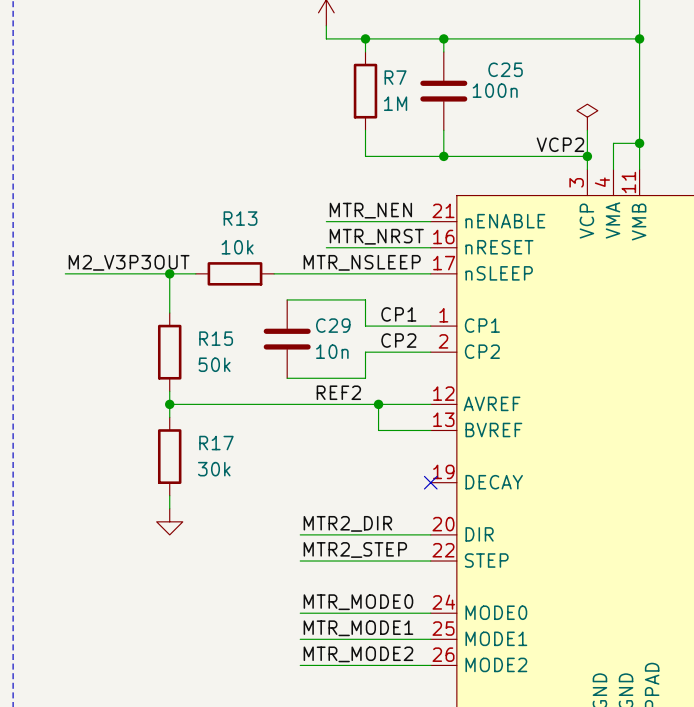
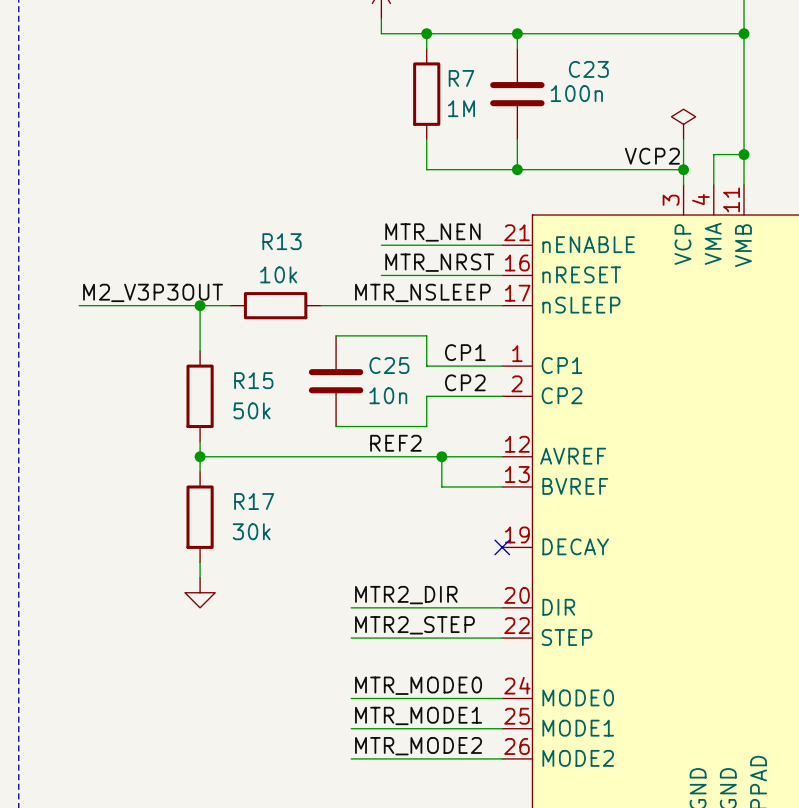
C25 name: C25 (505, 69) -> C23 (588, 69)
C29 name: C29 (333, 325) -> C25 (389, 365)

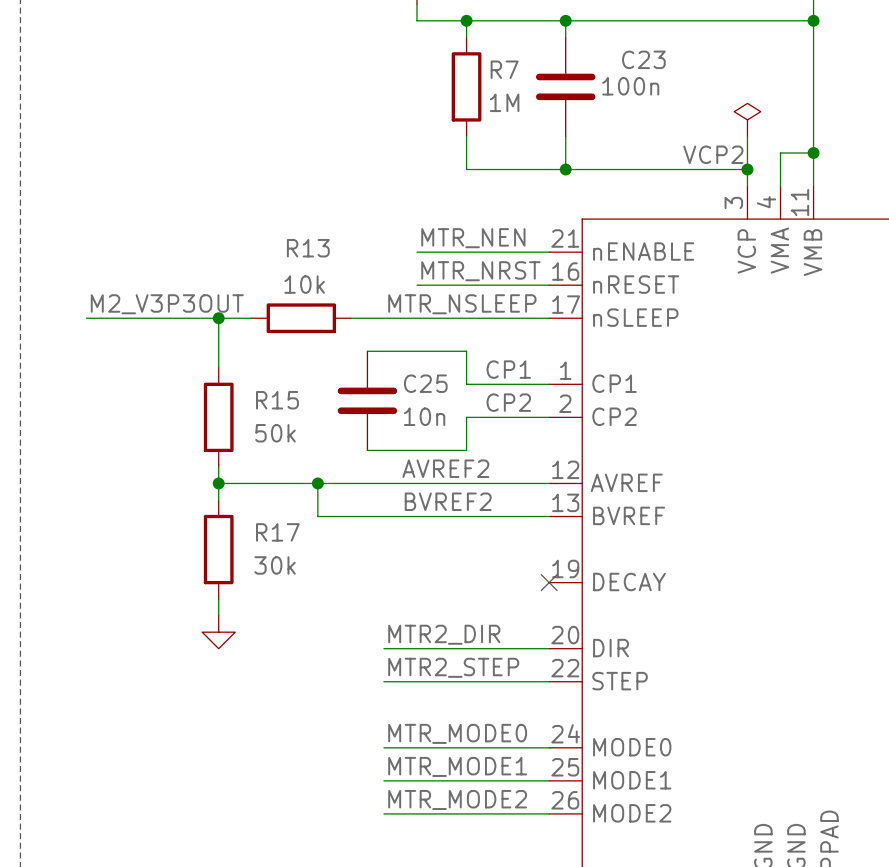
label: REF2 (395, 443) -> AVREF2 (445, 468)
junction: none -> (317, 483)
wire: (441, 456) (441, 486) -> (317, 483) (317, 516) (483, 516)
junction: (441, 456) -> none
label: none -> BVREF2 (448, 501)

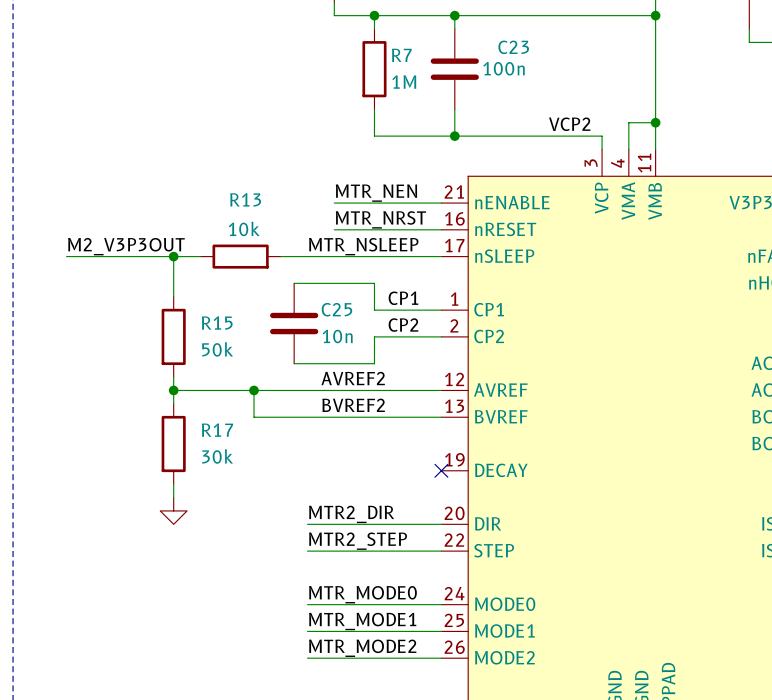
power symbol: (747, 119) -> none
wire: (747, 136) (747, 169) -> none
junction: (747, 169) -> none

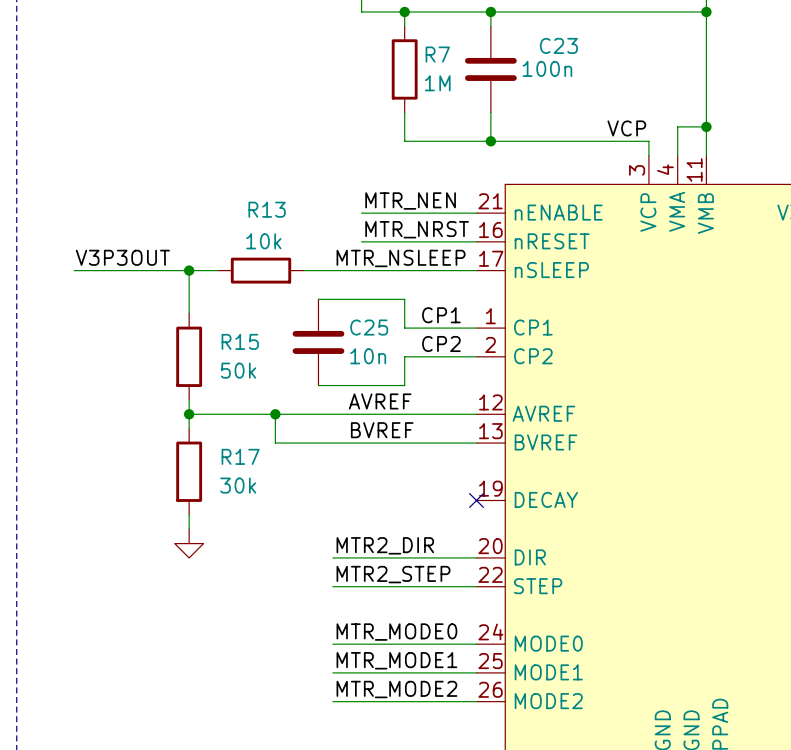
label: VCP2 (569, 124) -> VCP (626, 128)
label: M2_V3P3OUT (126, 246) -> V3P3OUT (122, 257)
label: AVREF2 (353, 378) -> AVREF (380, 401)
label: BVREF2 (353, 405) -> BVREF (382, 430)

